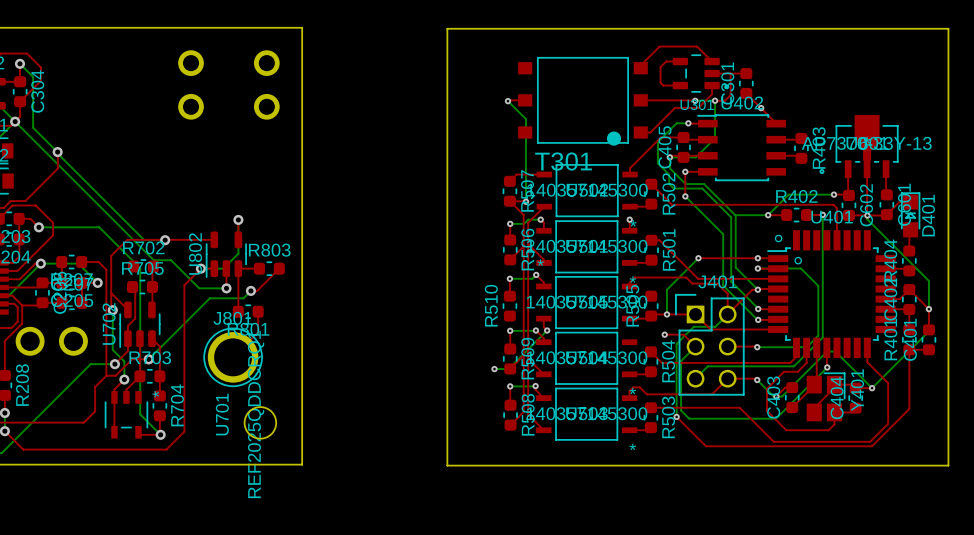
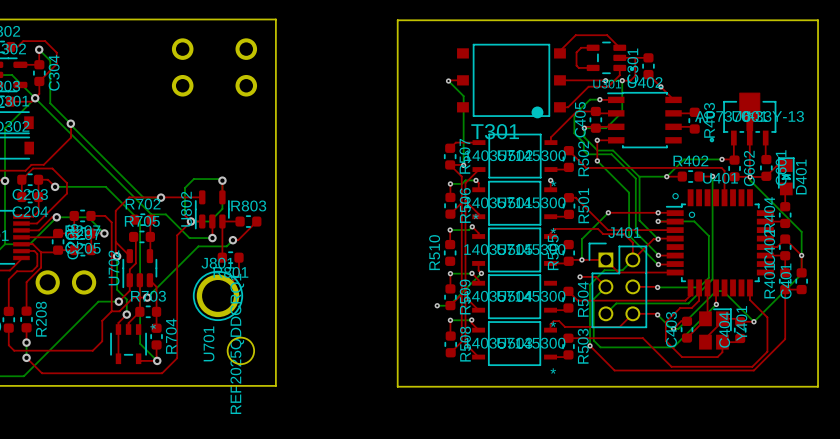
bottom track: none -> (222, 179) (193, 179) (184, 187) (184, 214)
top track: none -> (184, 214) (191, 221)

